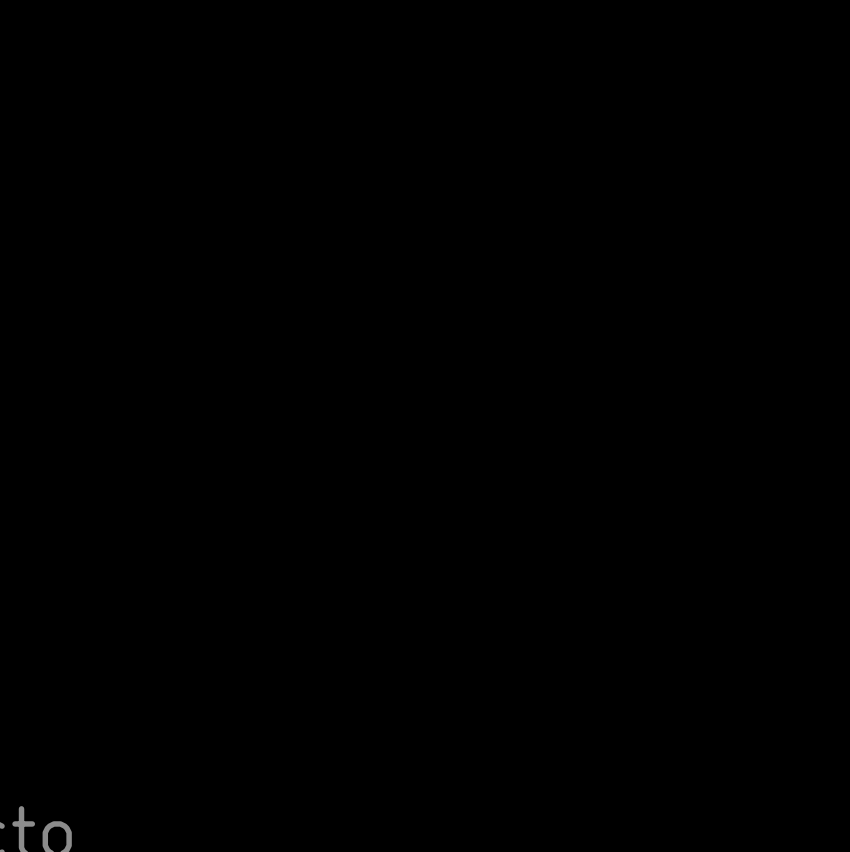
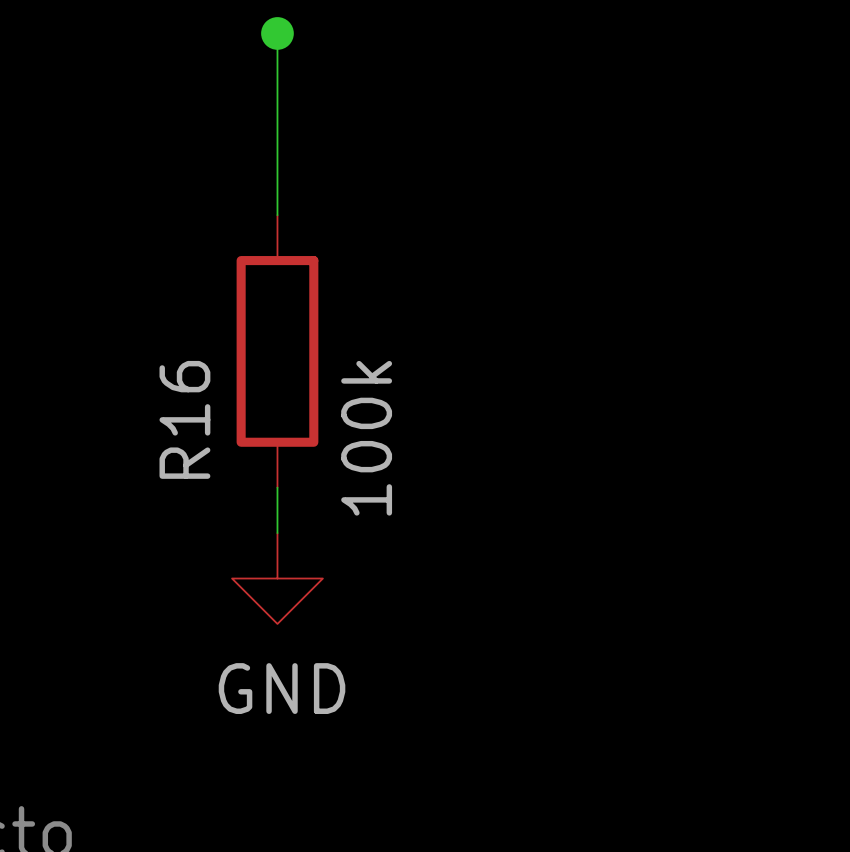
wire: none -> (277, 33) (277, 215)
junction: none -> (277, 33)
R16: none -> 100k (277, 351)
wire: none -> (277, 487) (277, 533)
power symbol: none -> GND (277, 578)

